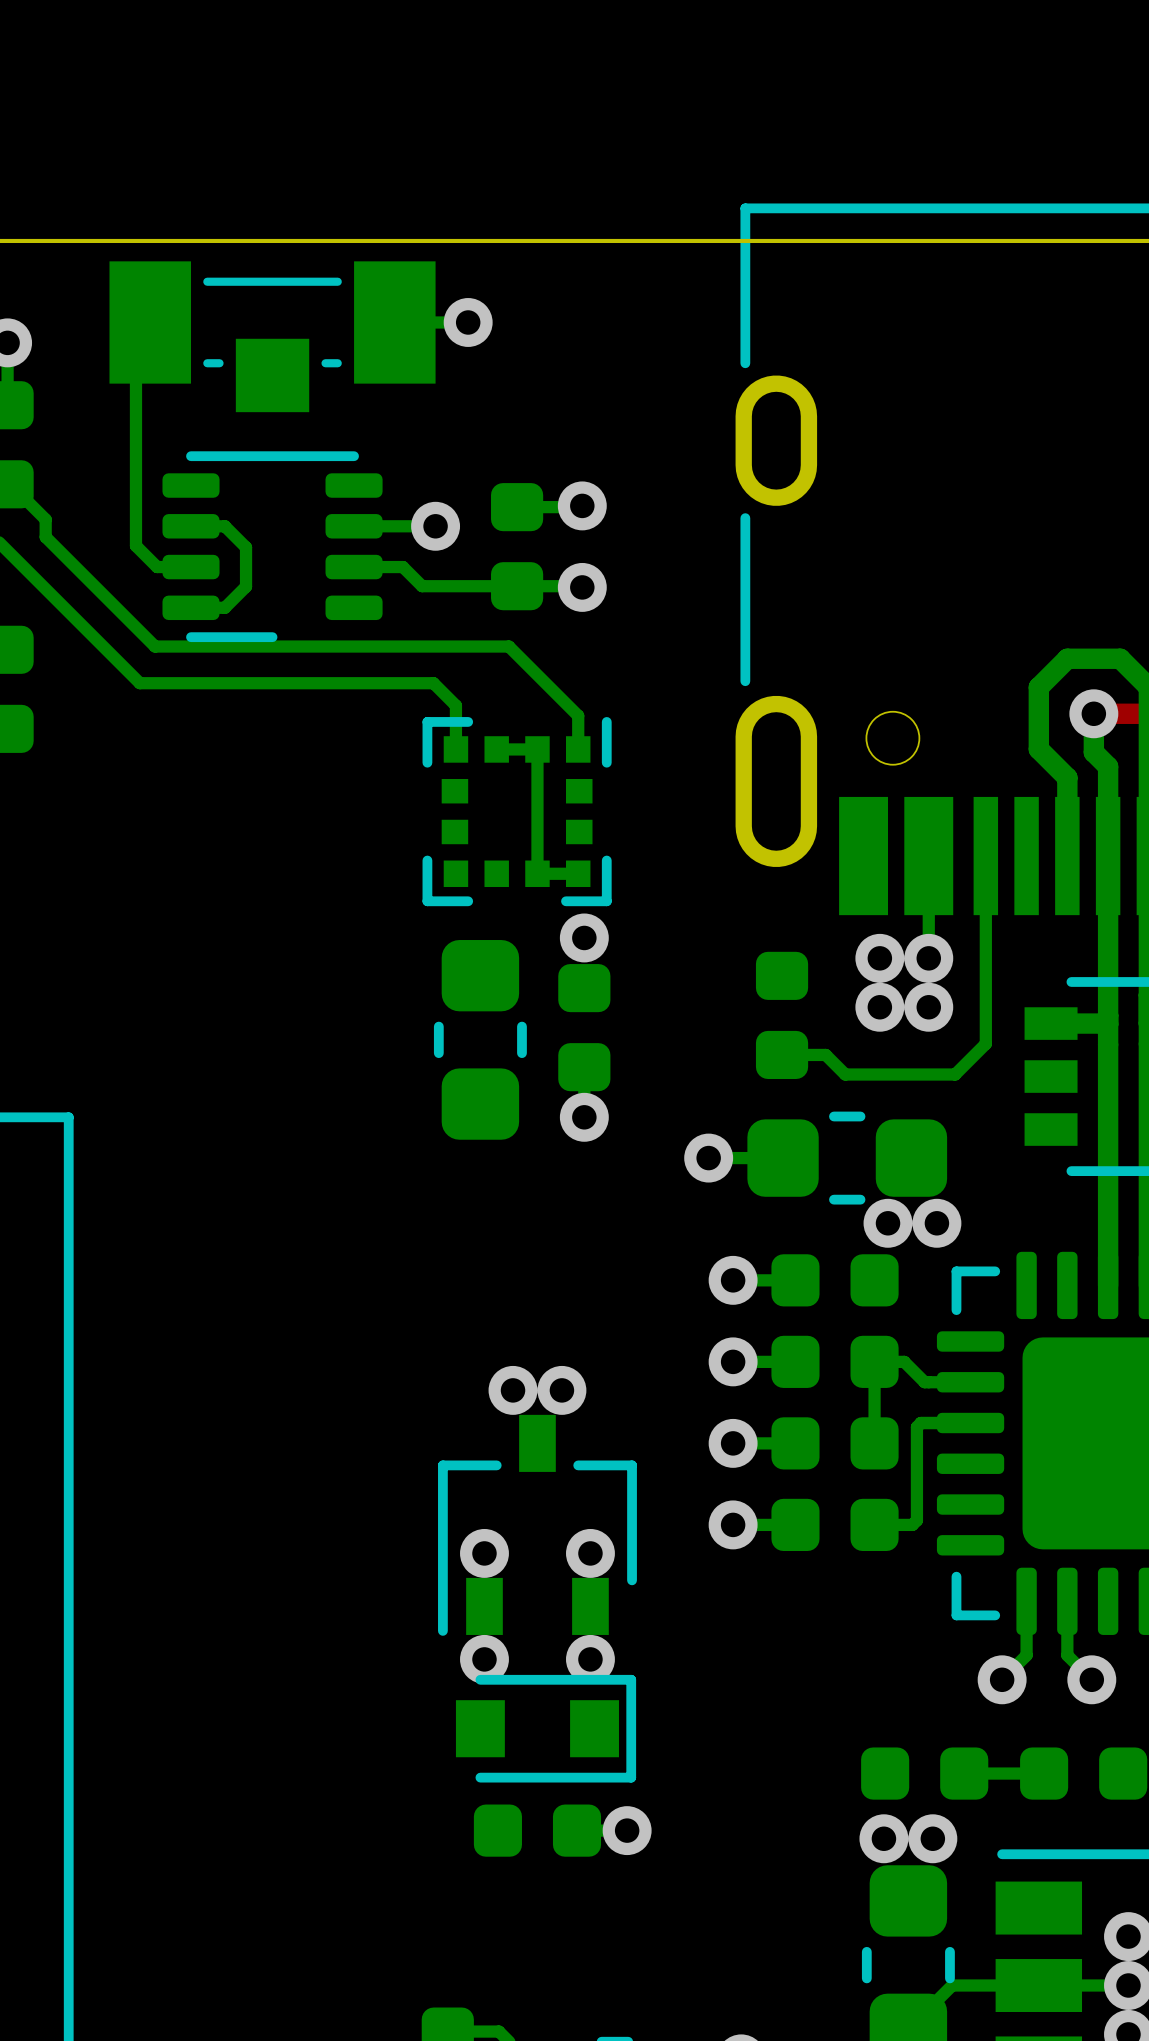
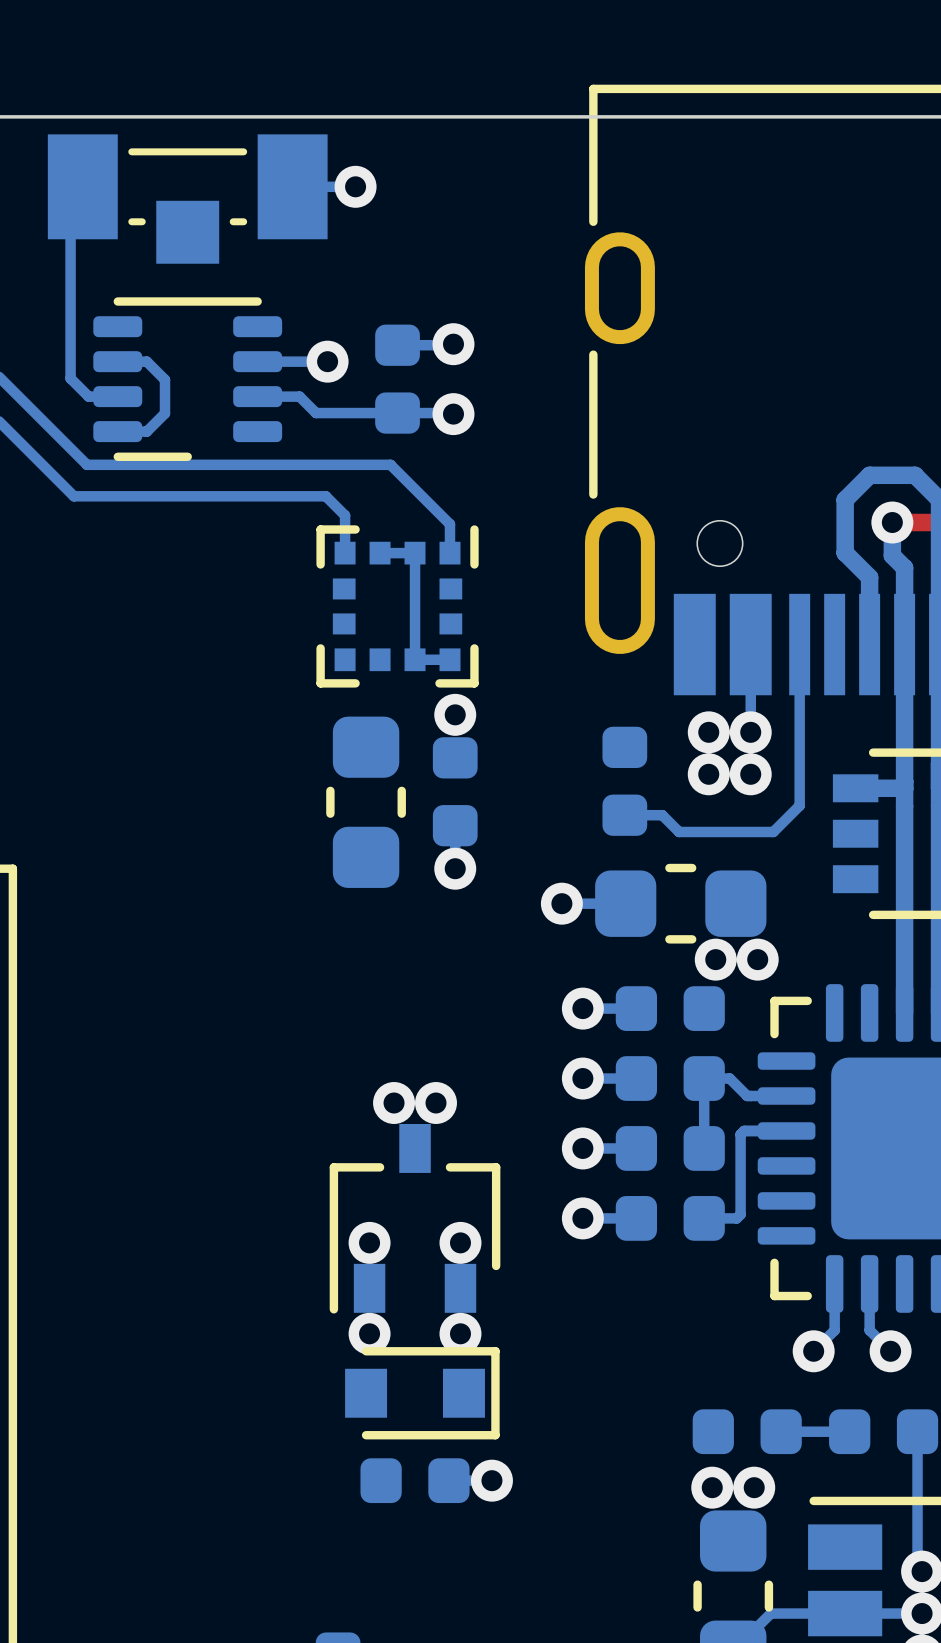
bottom track: none -> (917, 1431) (917, 1567) (922, 1571)

